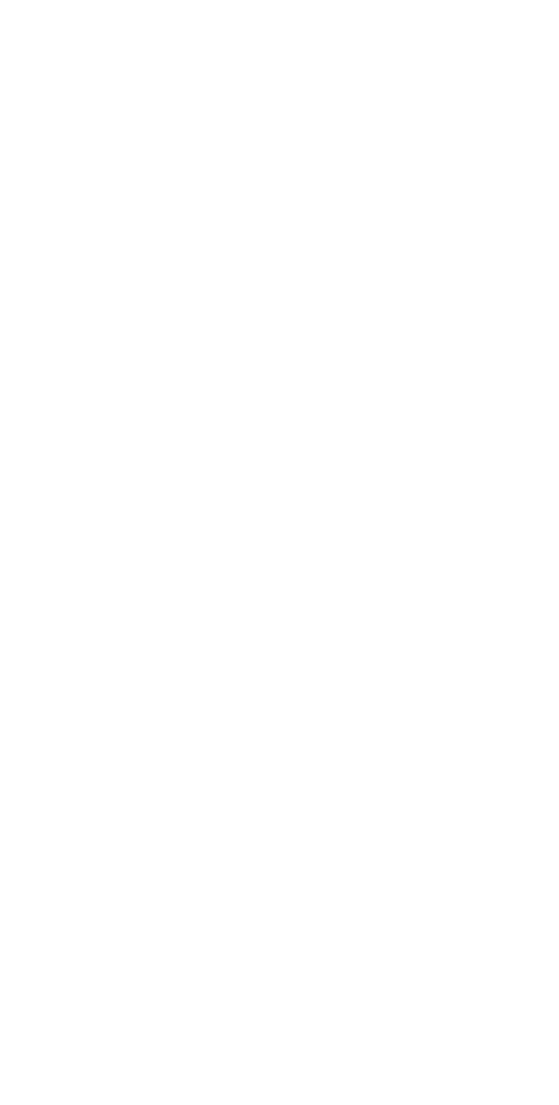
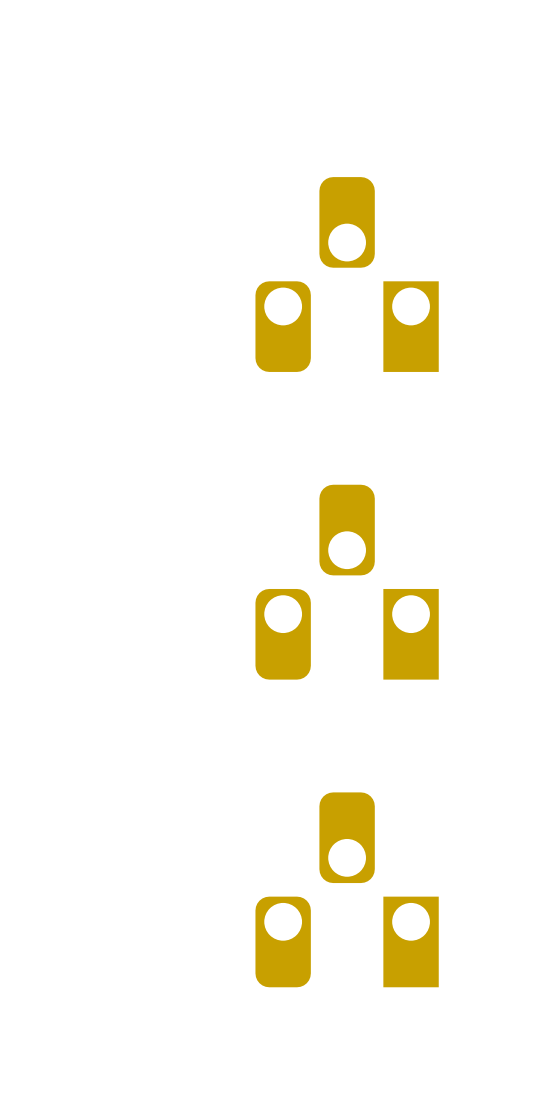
part: none -> (347, 274)
part: none -> (347, 582)
part: none -> (347, 889)

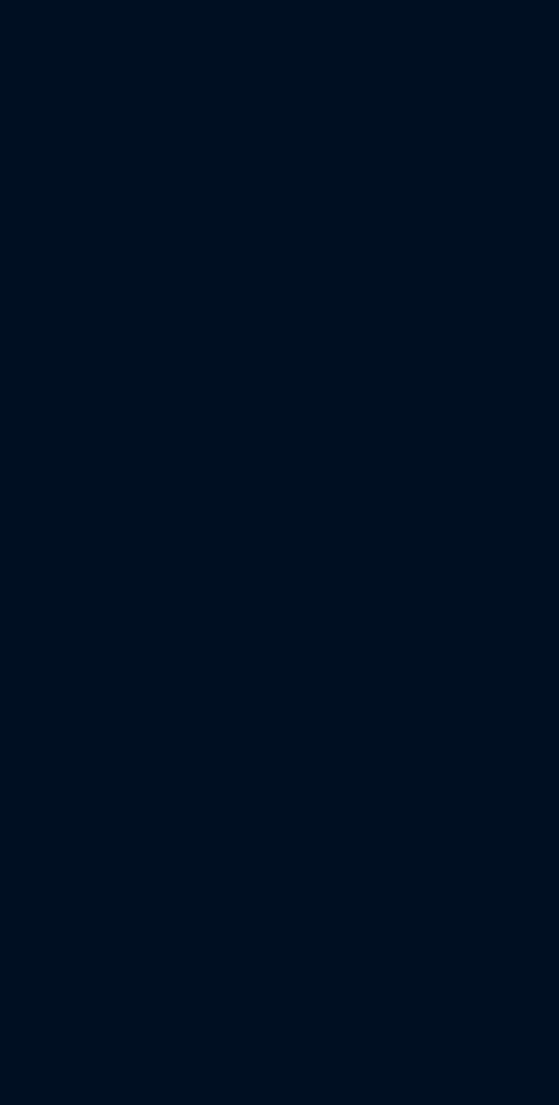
part: (347, 274) -> none
part: (347, 582) -> none
part: (347, 889) -> none

